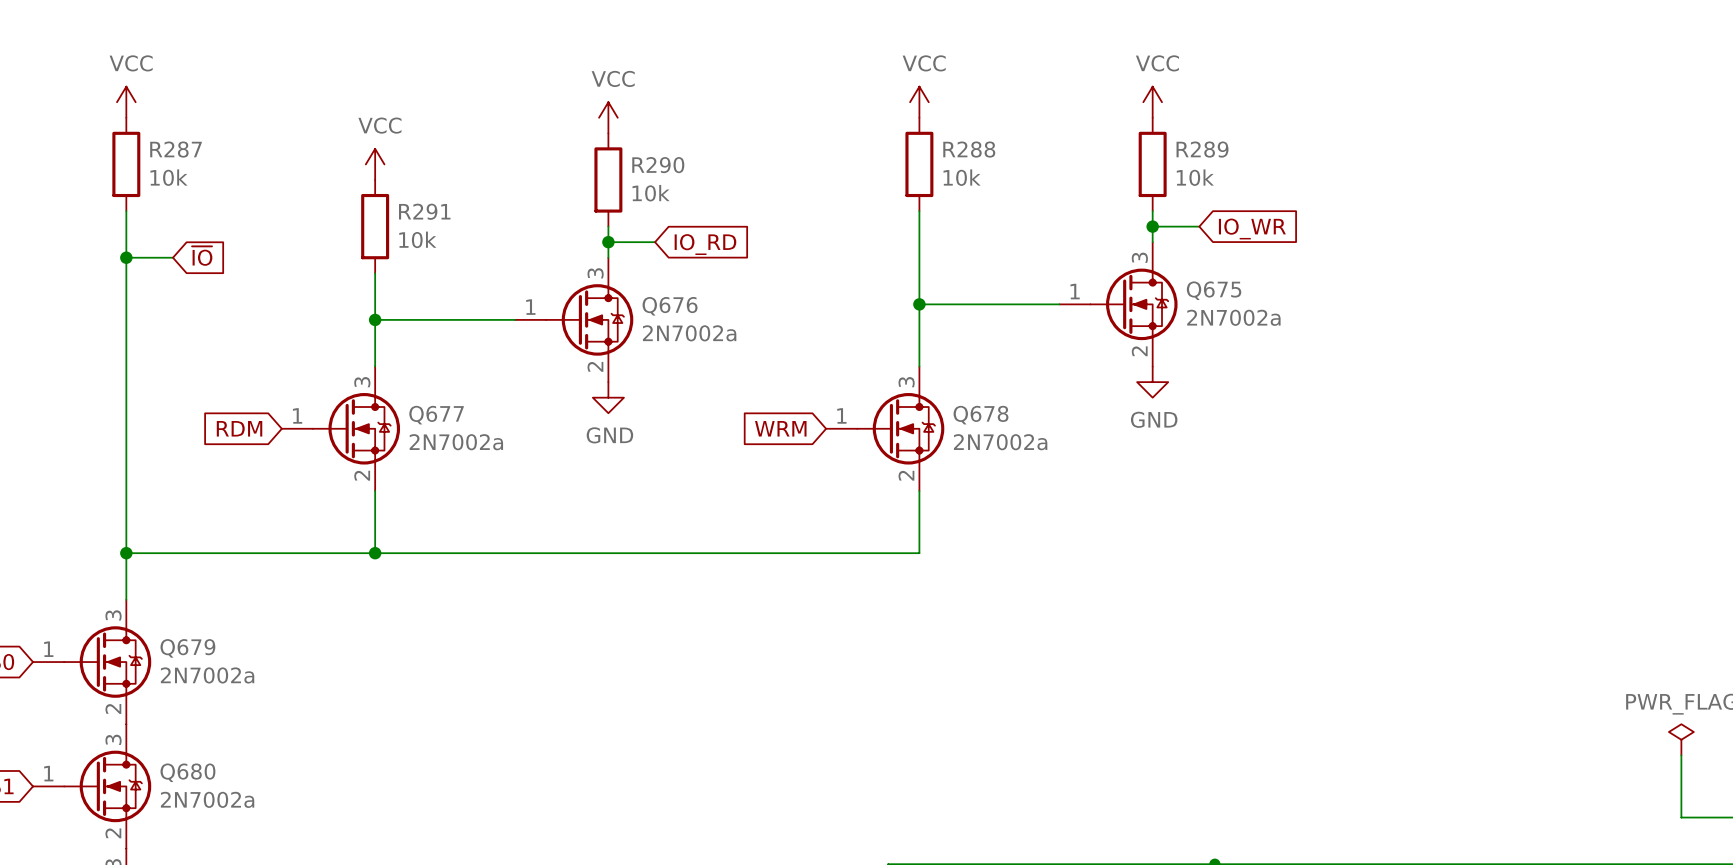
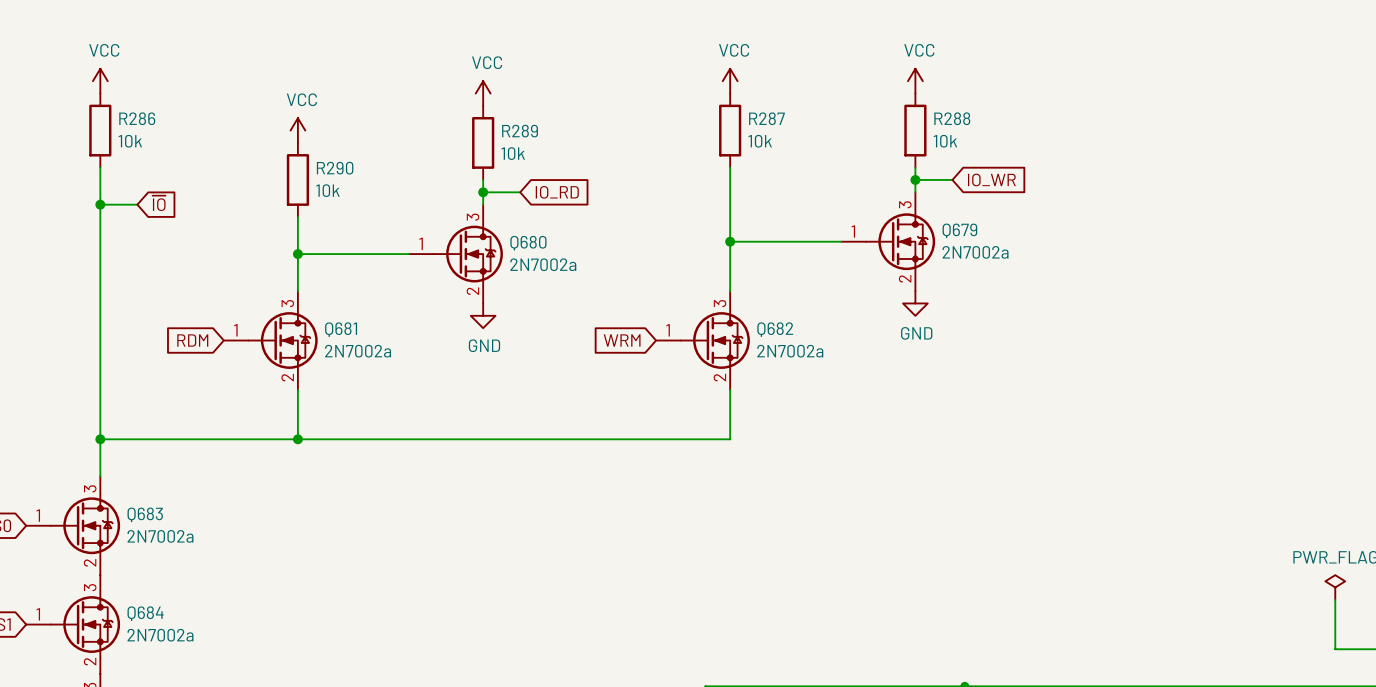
R287 name: R287 (176, 149) -> R286 (137, 118)
R288 name: R288 (969, 149) -> R287 (766, 118)
R289 name: R289 (1202, 149) -> R288 (952, 118)
R290 name: R290 (658, 165) -> R289 (520, 131)
R291 name: R291 (424, 211) -> R290 (335, 168)
Q675 name: Q675 (1214, 290) -> Q679 (959, 230)
Q676 name: Q676 (670, 306) -> Q680 (528, 243)
Q677 name: Q677 (436, 415) -> Q681 (341, 329)
Q678 name: Q678 (981, 415) -> Q682 (775, 329)
Q679 name: Q679 (187, 648) -> Q683 (145, 514)
Q680 name: Q680 (187, 772) -> Q684 (145, 613)

